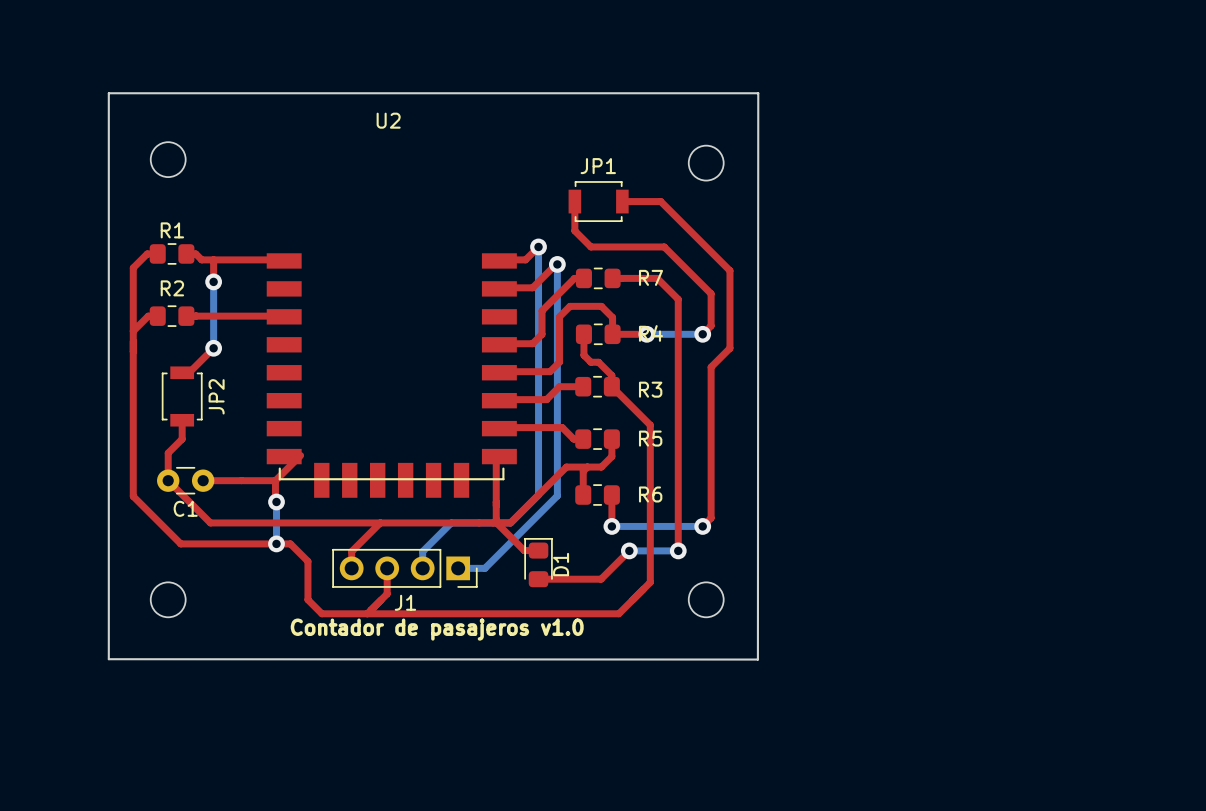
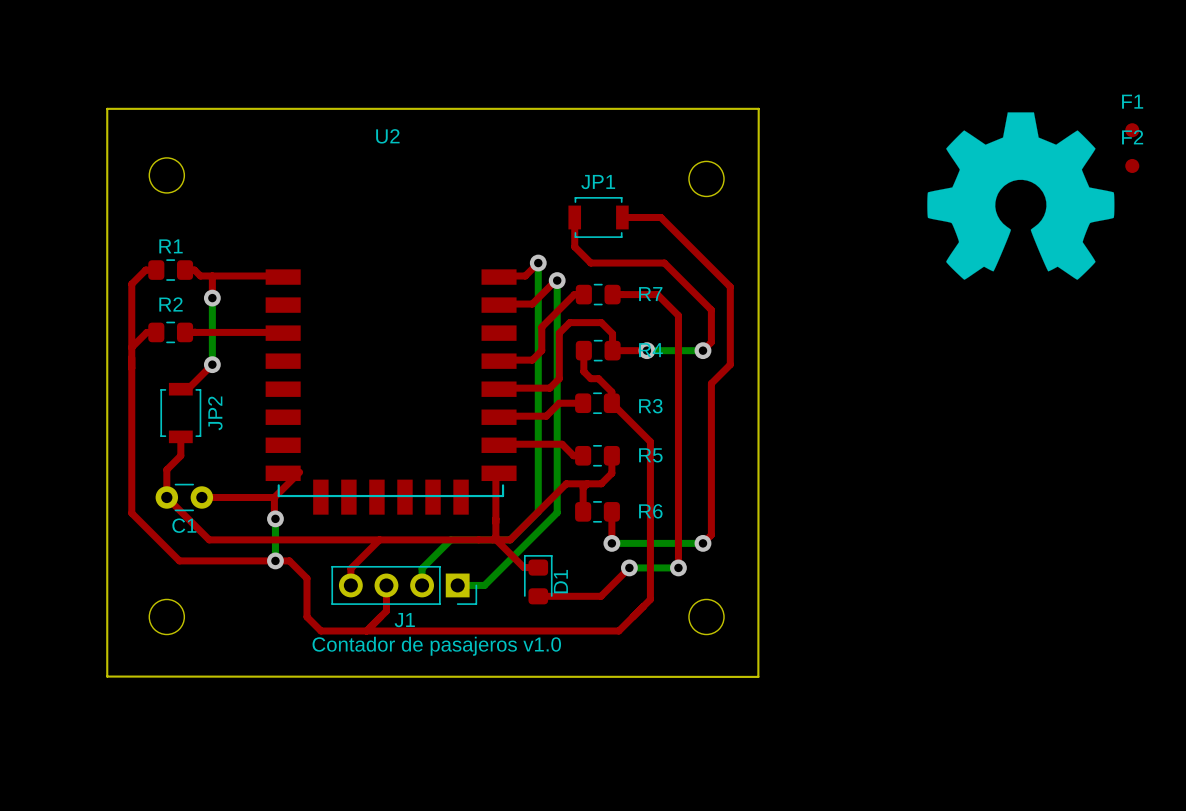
drawing: none -> [927, 112, 1115, 280]
F1: none -> (1132, 130)
F2: none -> (1132, 165)

